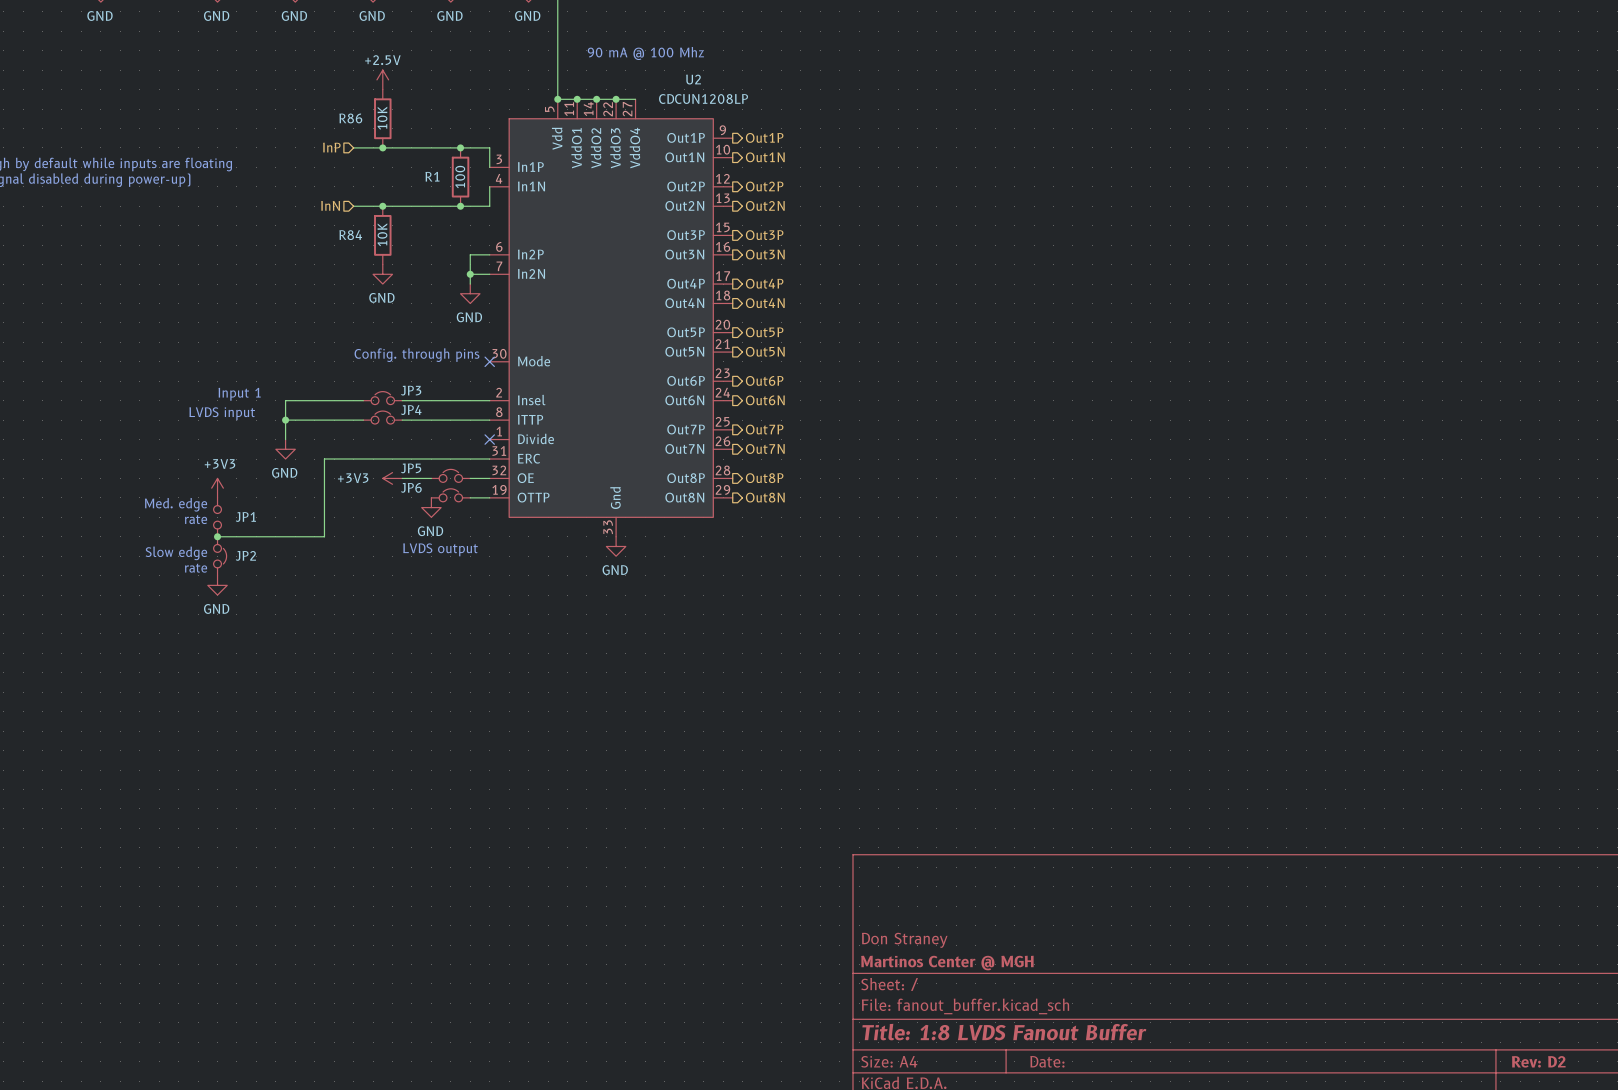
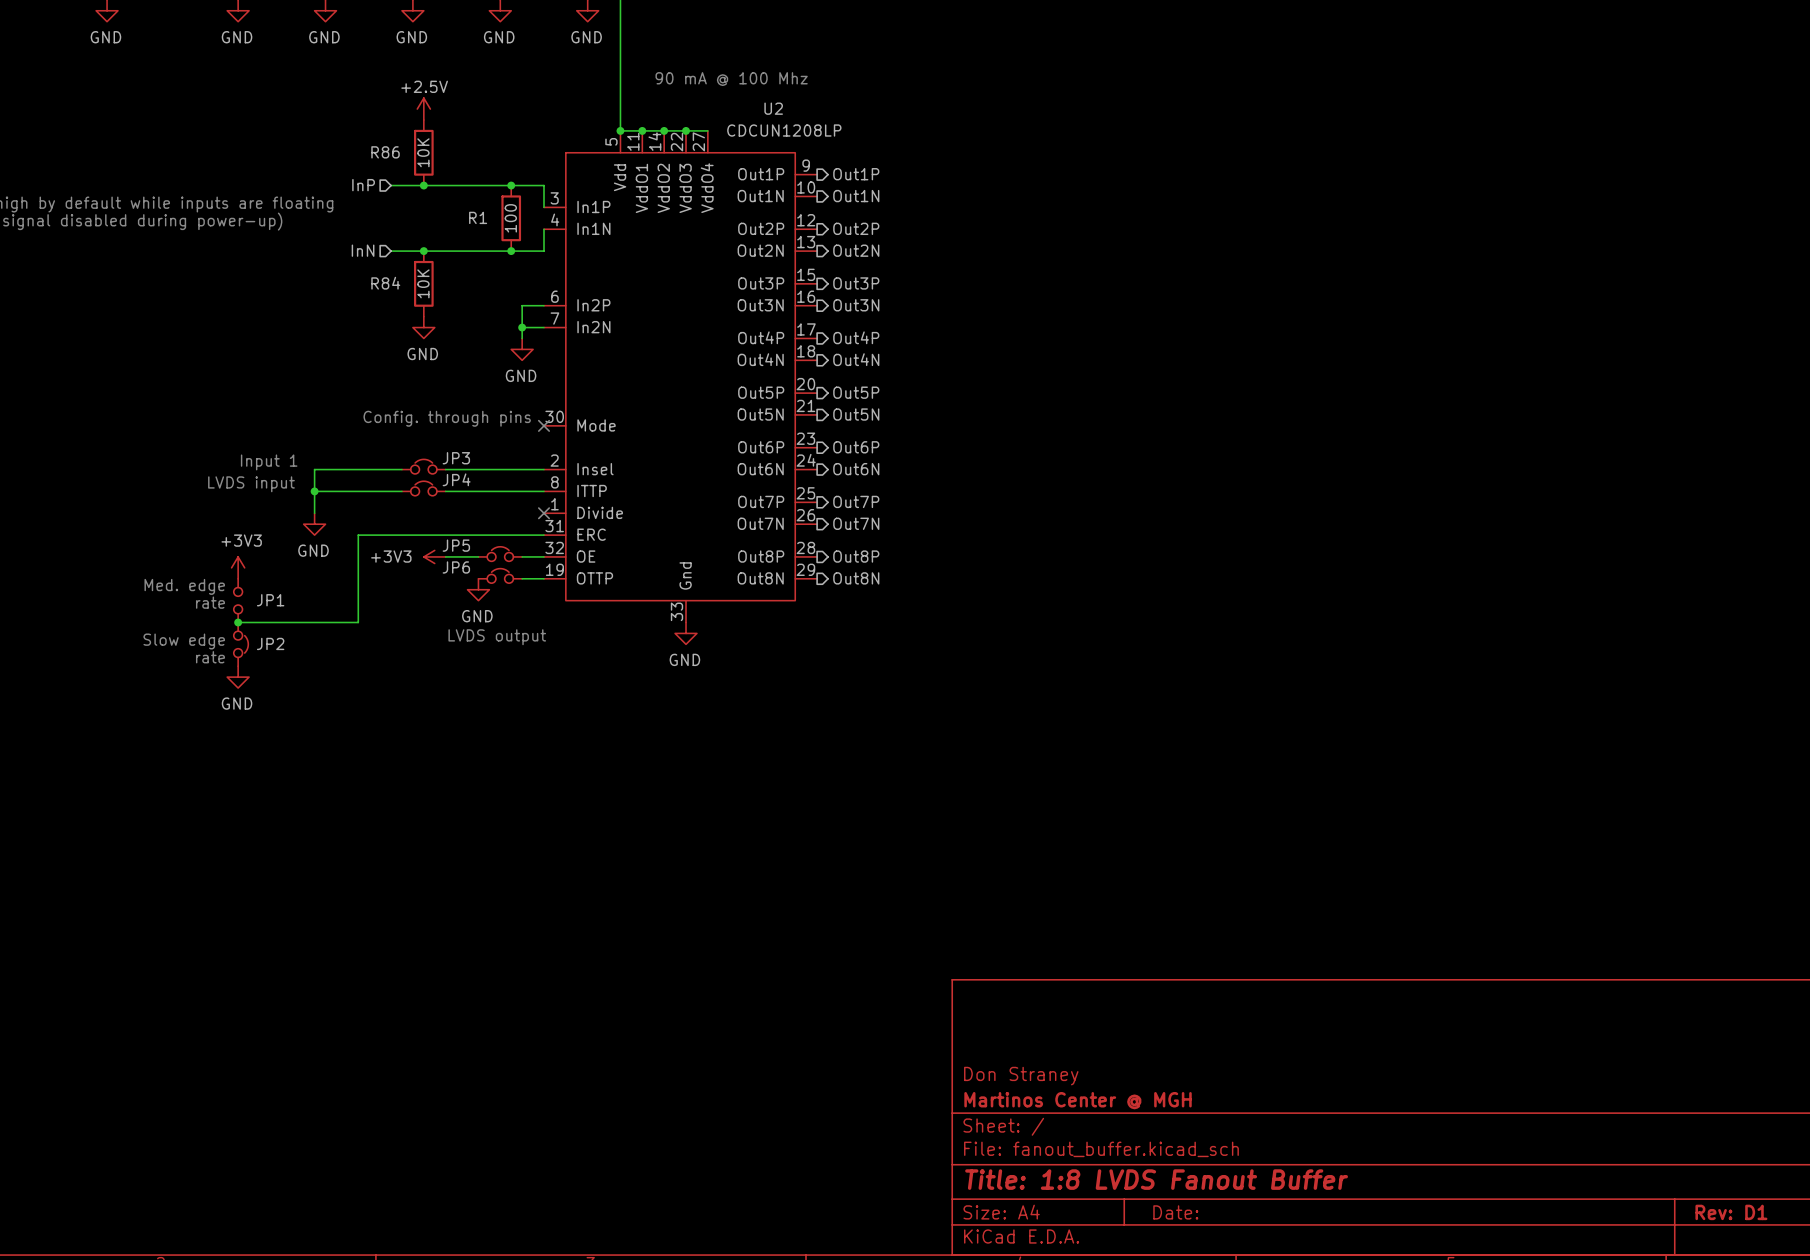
title block: Rev: D2 (1538, 1061) -> Rev: D1 (1731, 1212)

